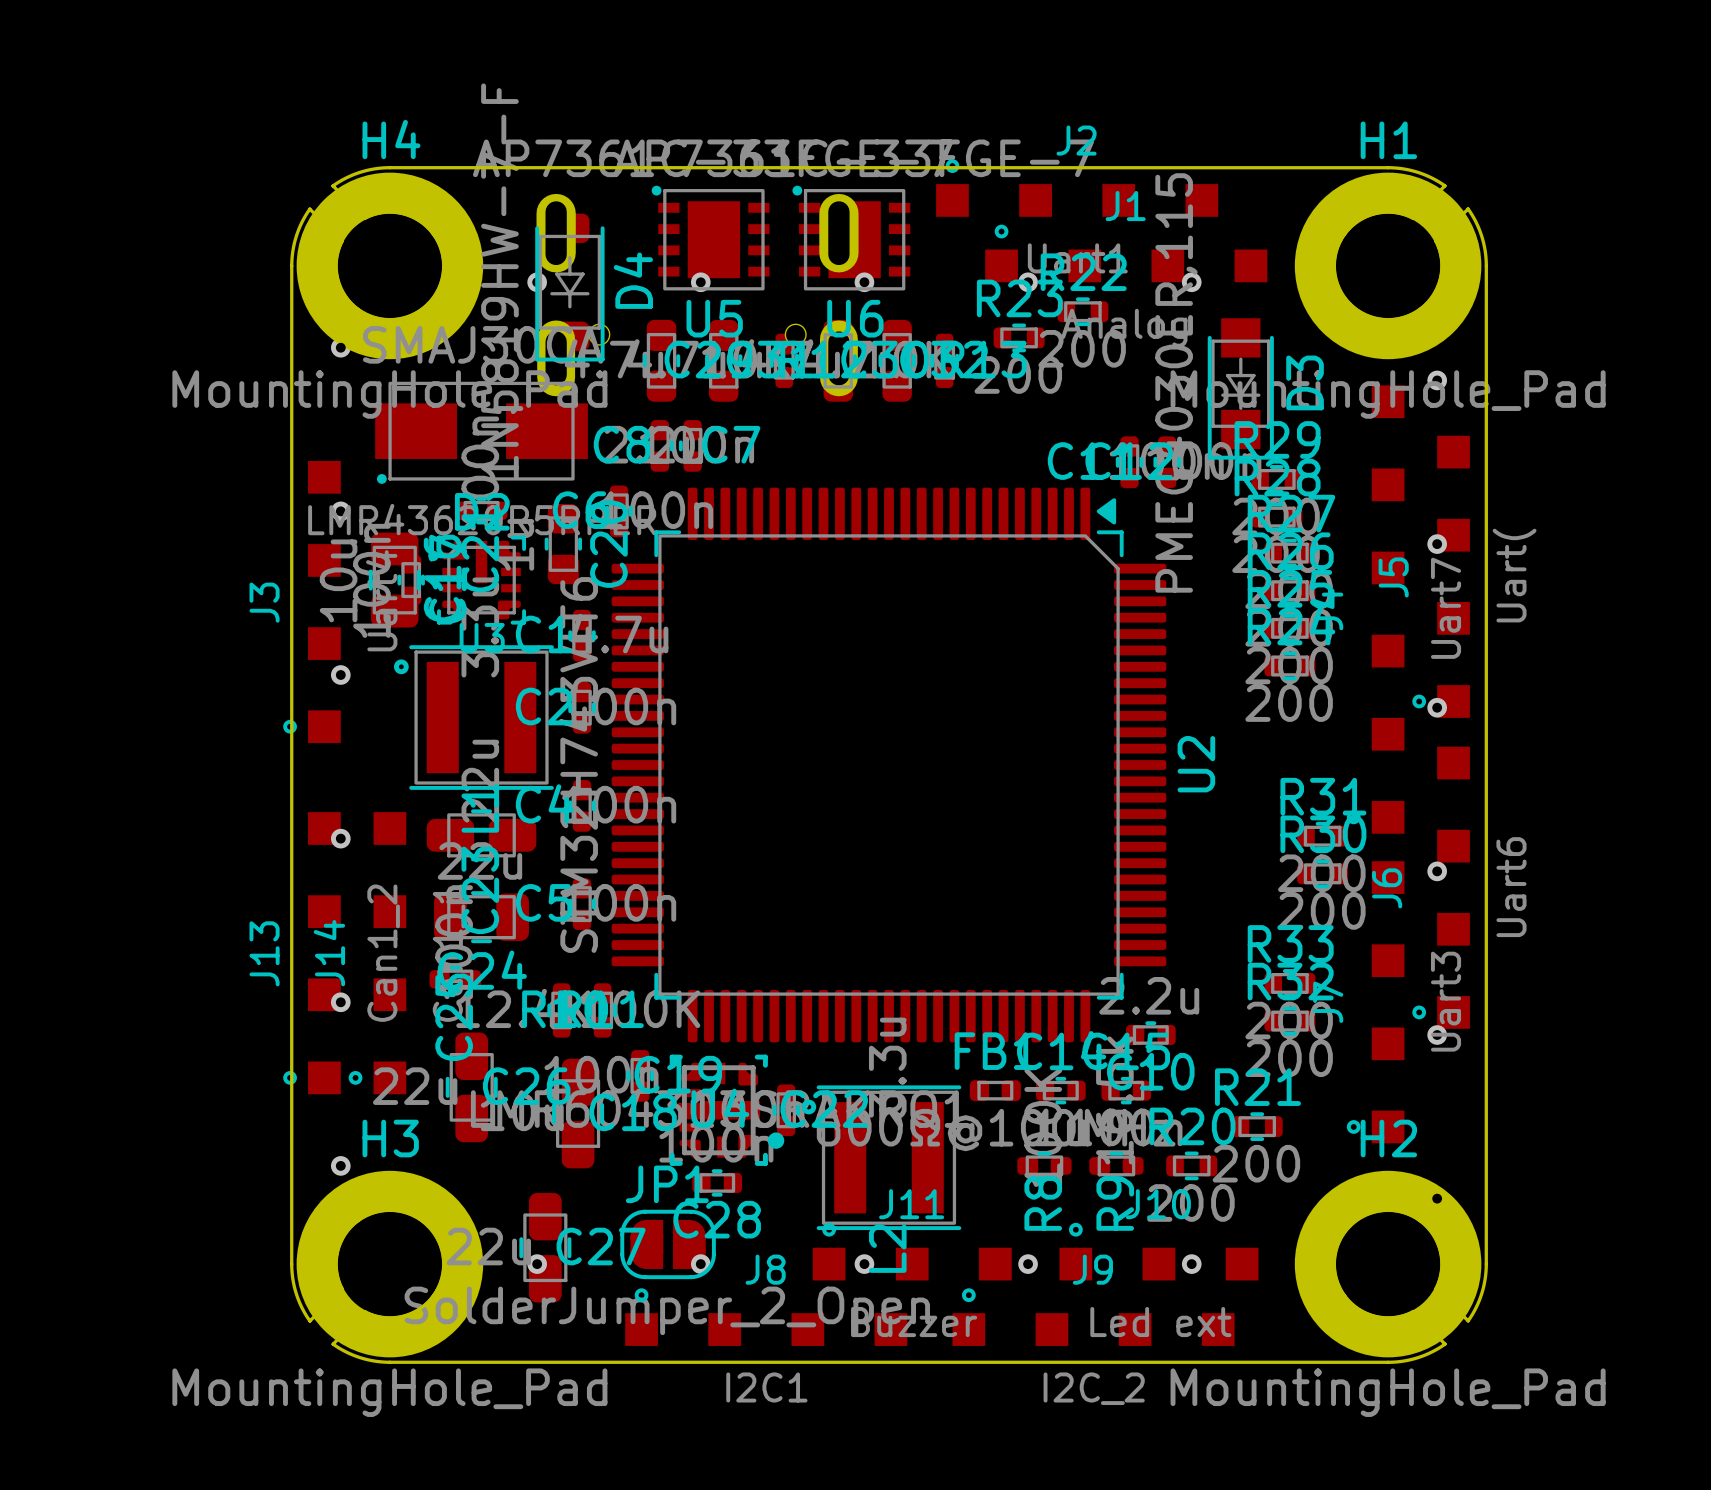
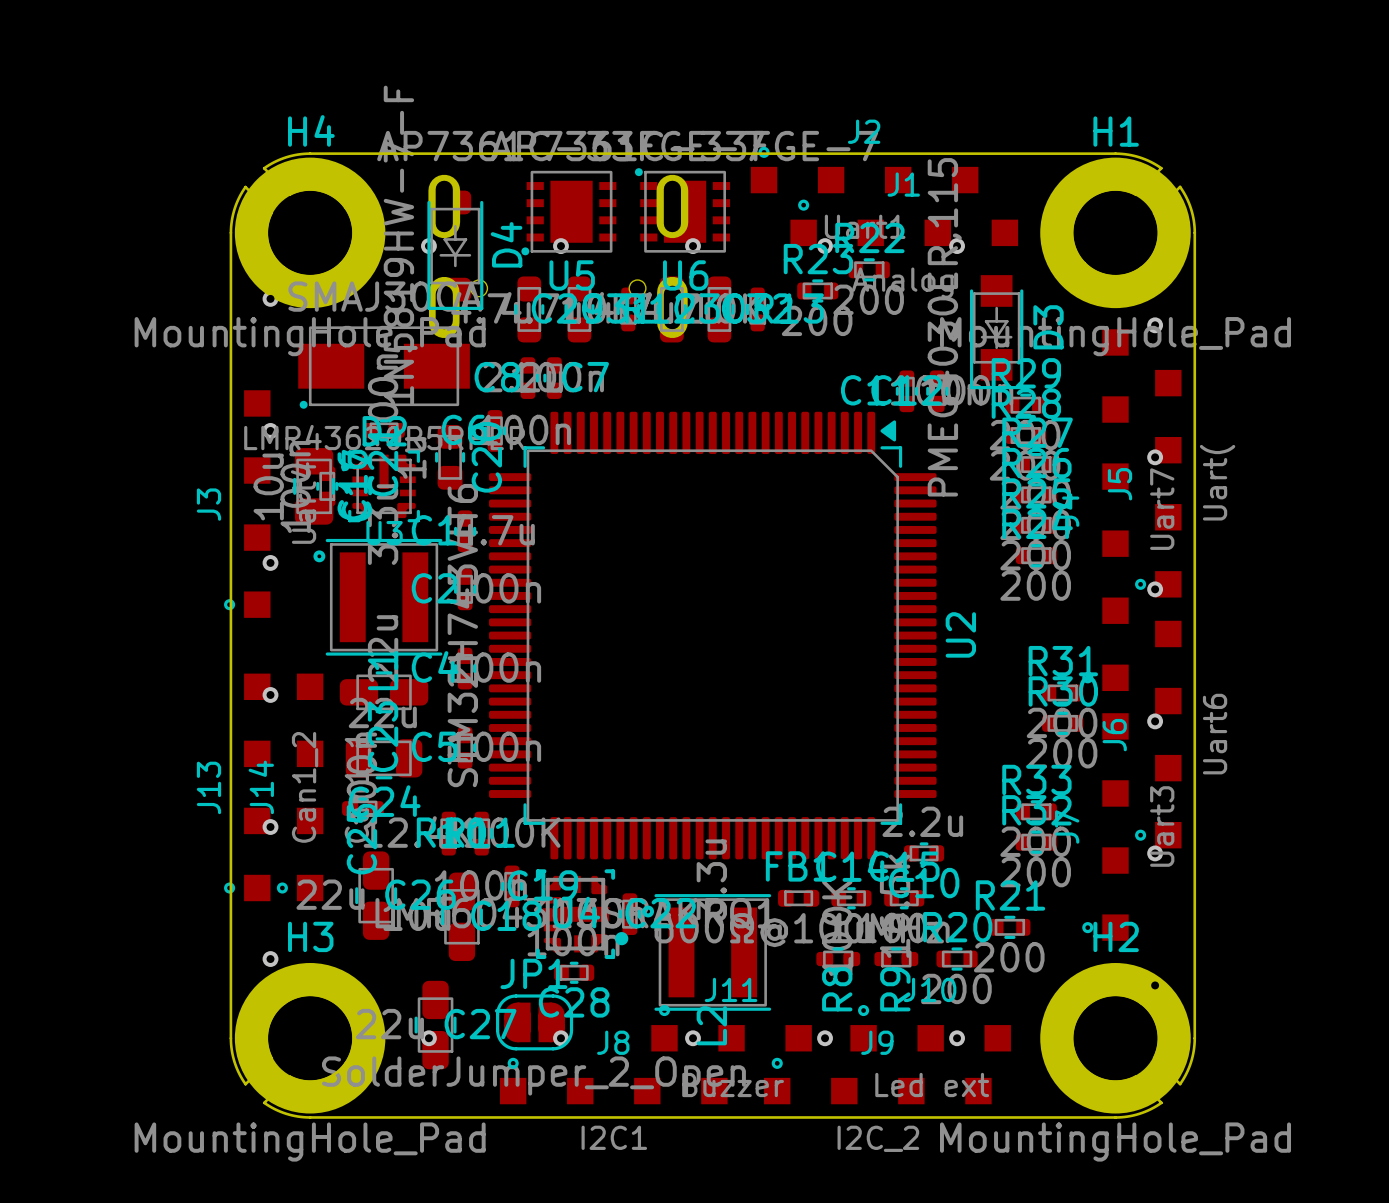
U5 footprint: [651, 185, 770, 291] -> [521, 170, 617, 256]

